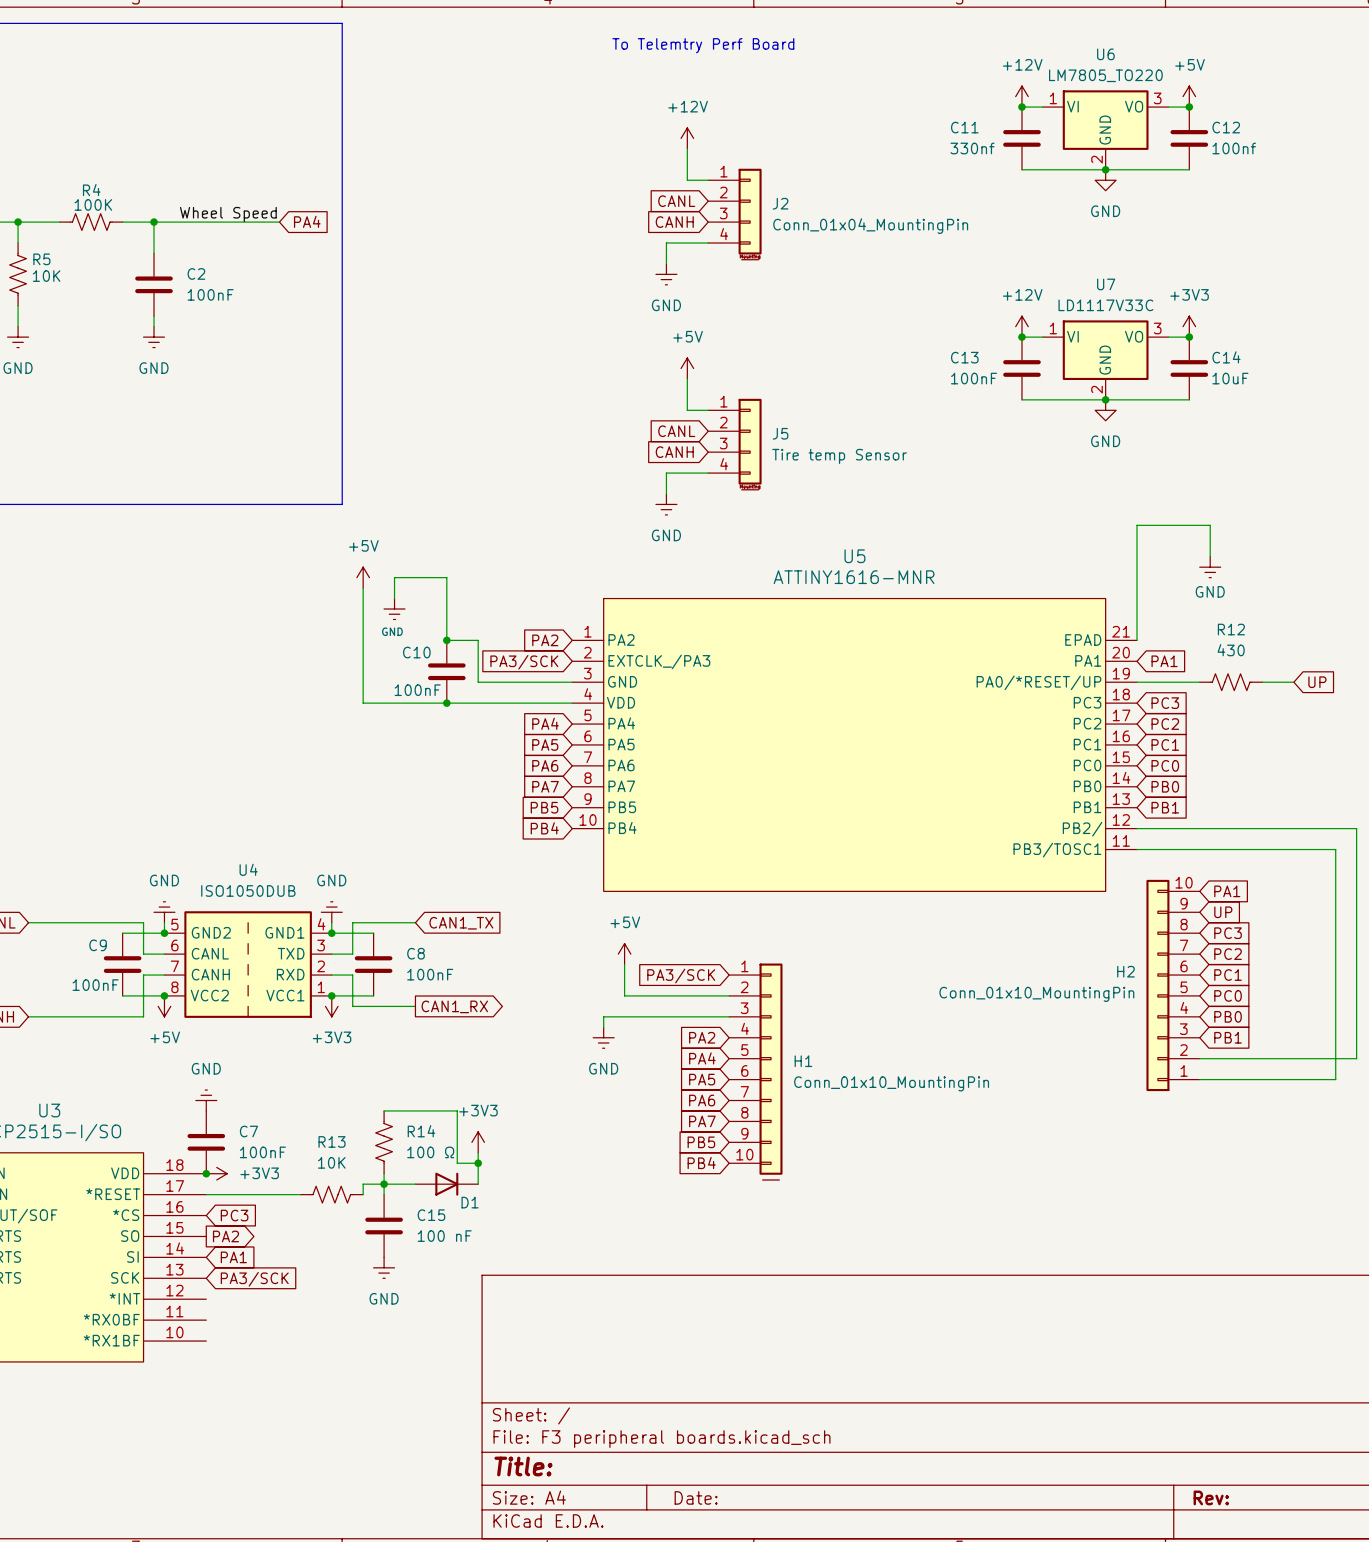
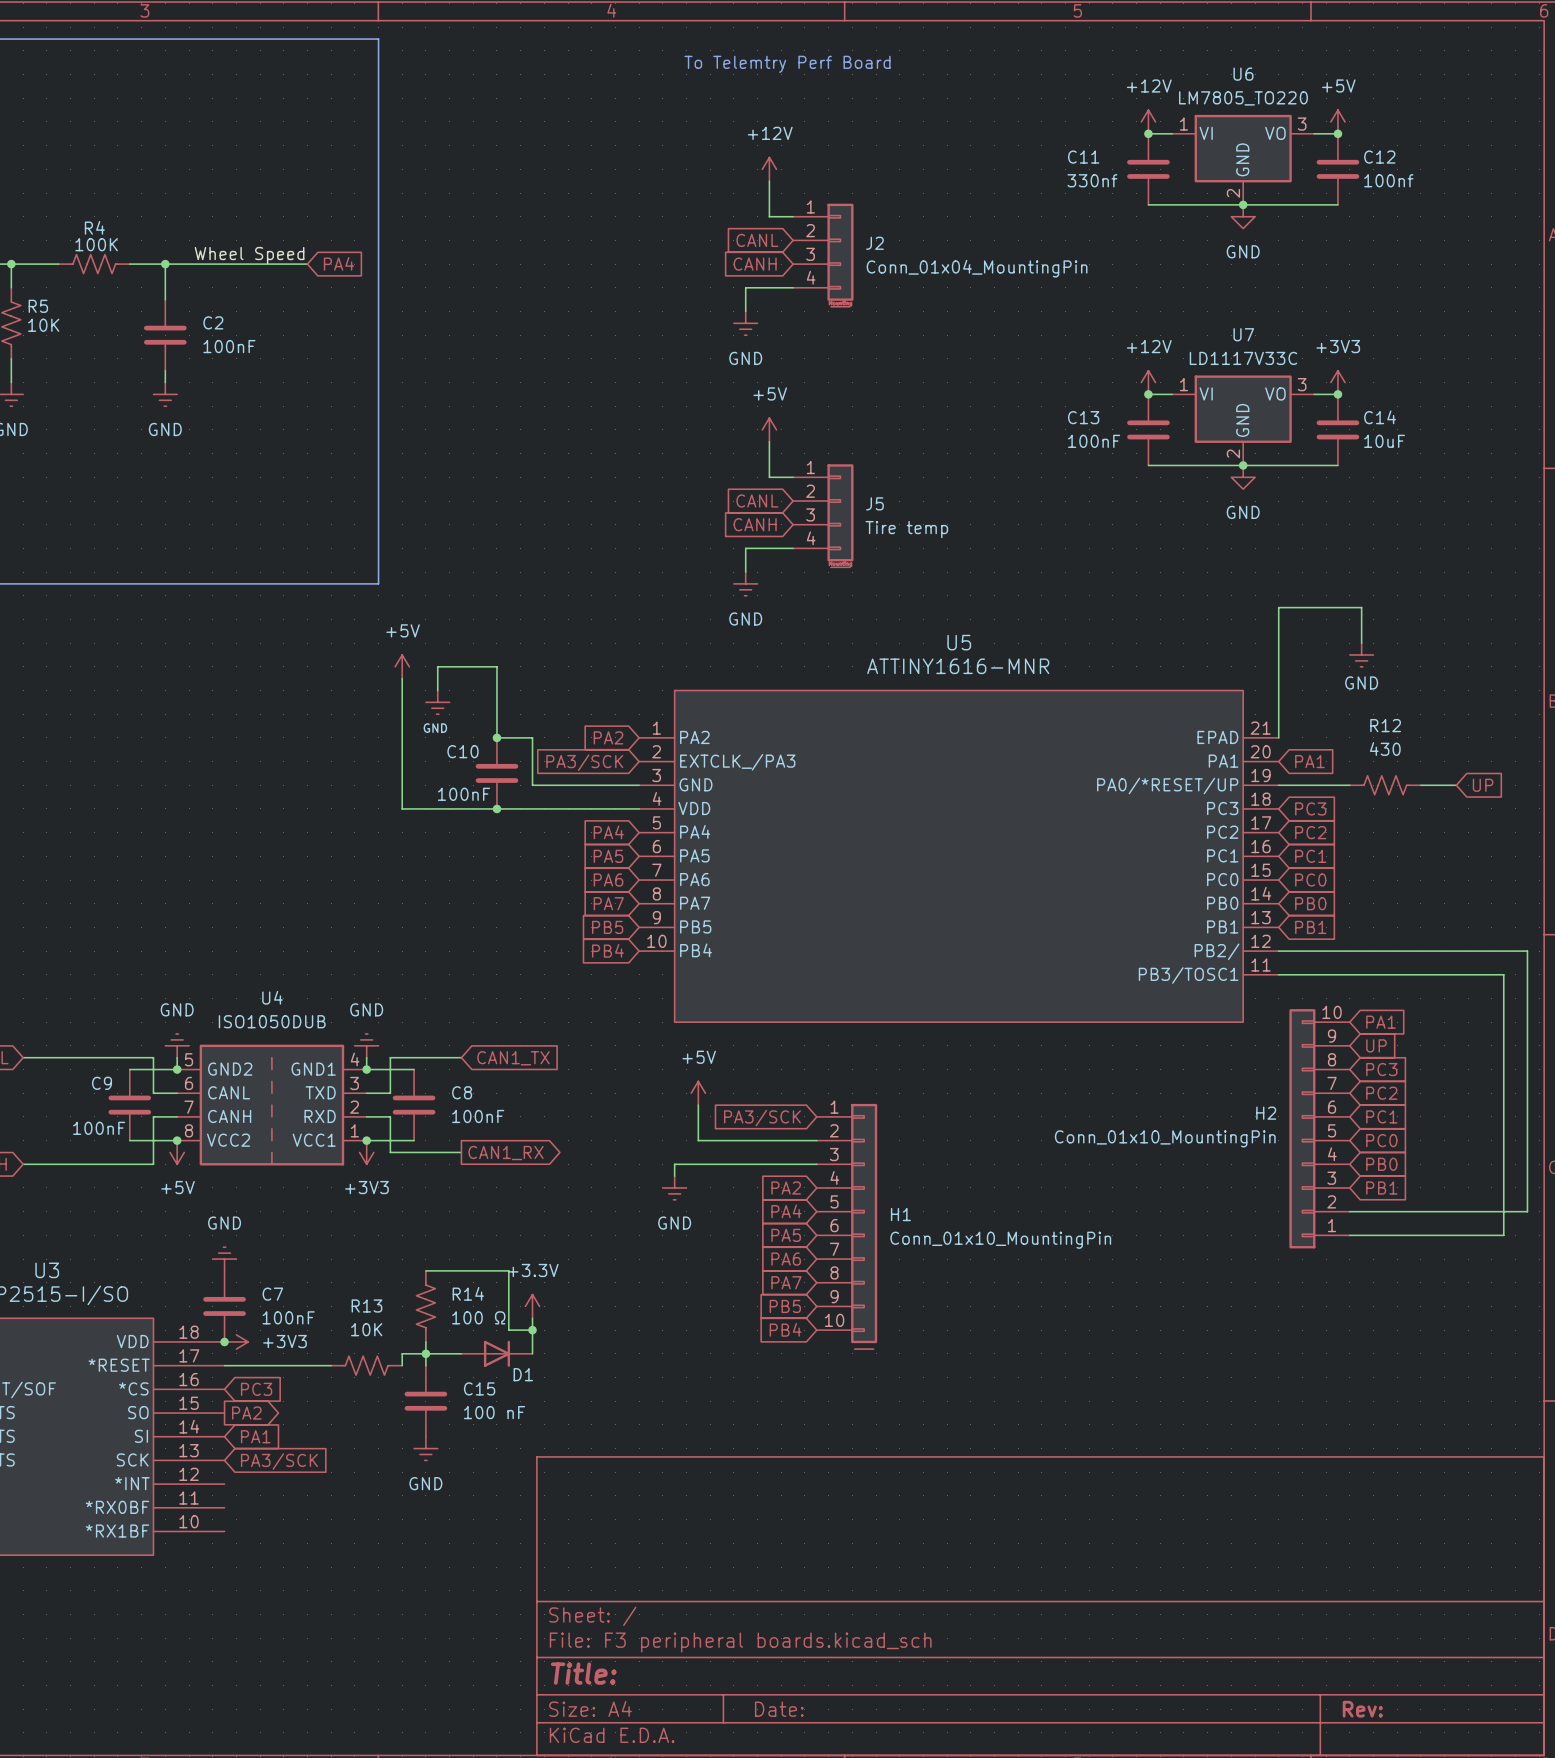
J5 value: Tire temp Sensor (839, 456) -> Tire temp (906, 529)
power symbol: +3V3 (478, 1142) -> +3.3V (532, 1306)

